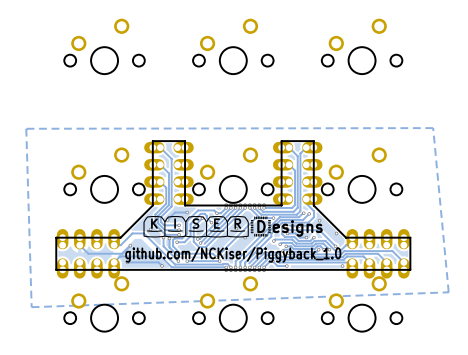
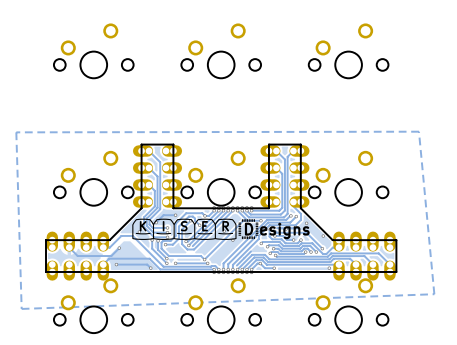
text: github.com/NCKiser/Piggyback_1.0 (233, 254) -> none

